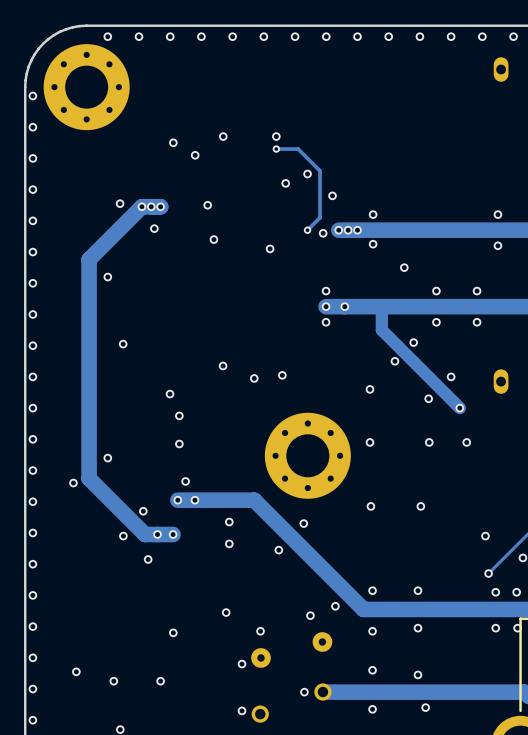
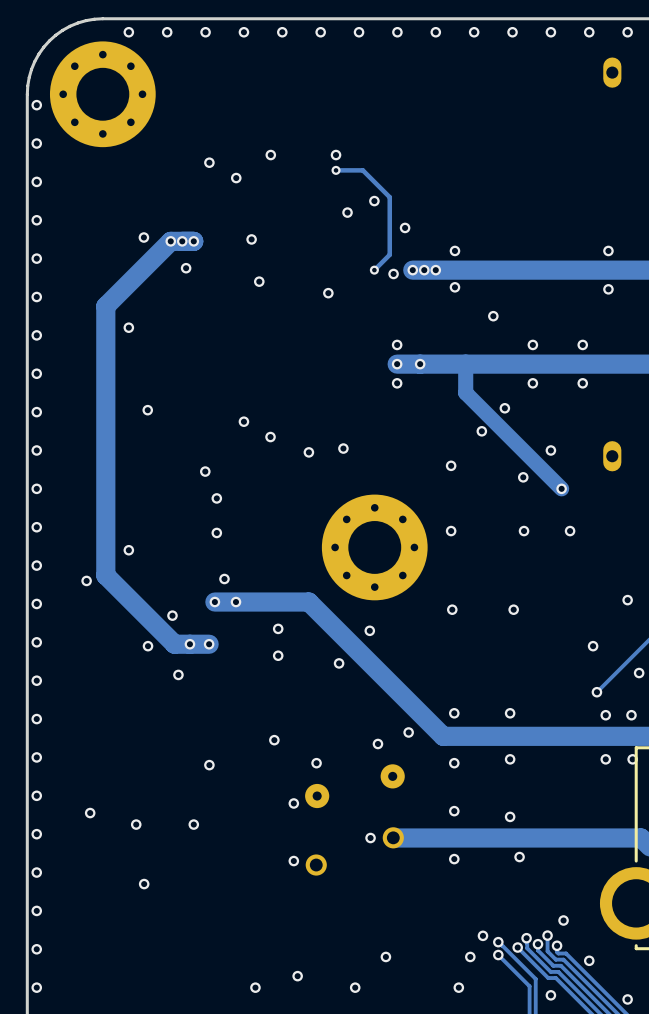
via: none -> (243, 421)
via: none -> (627, 600)

